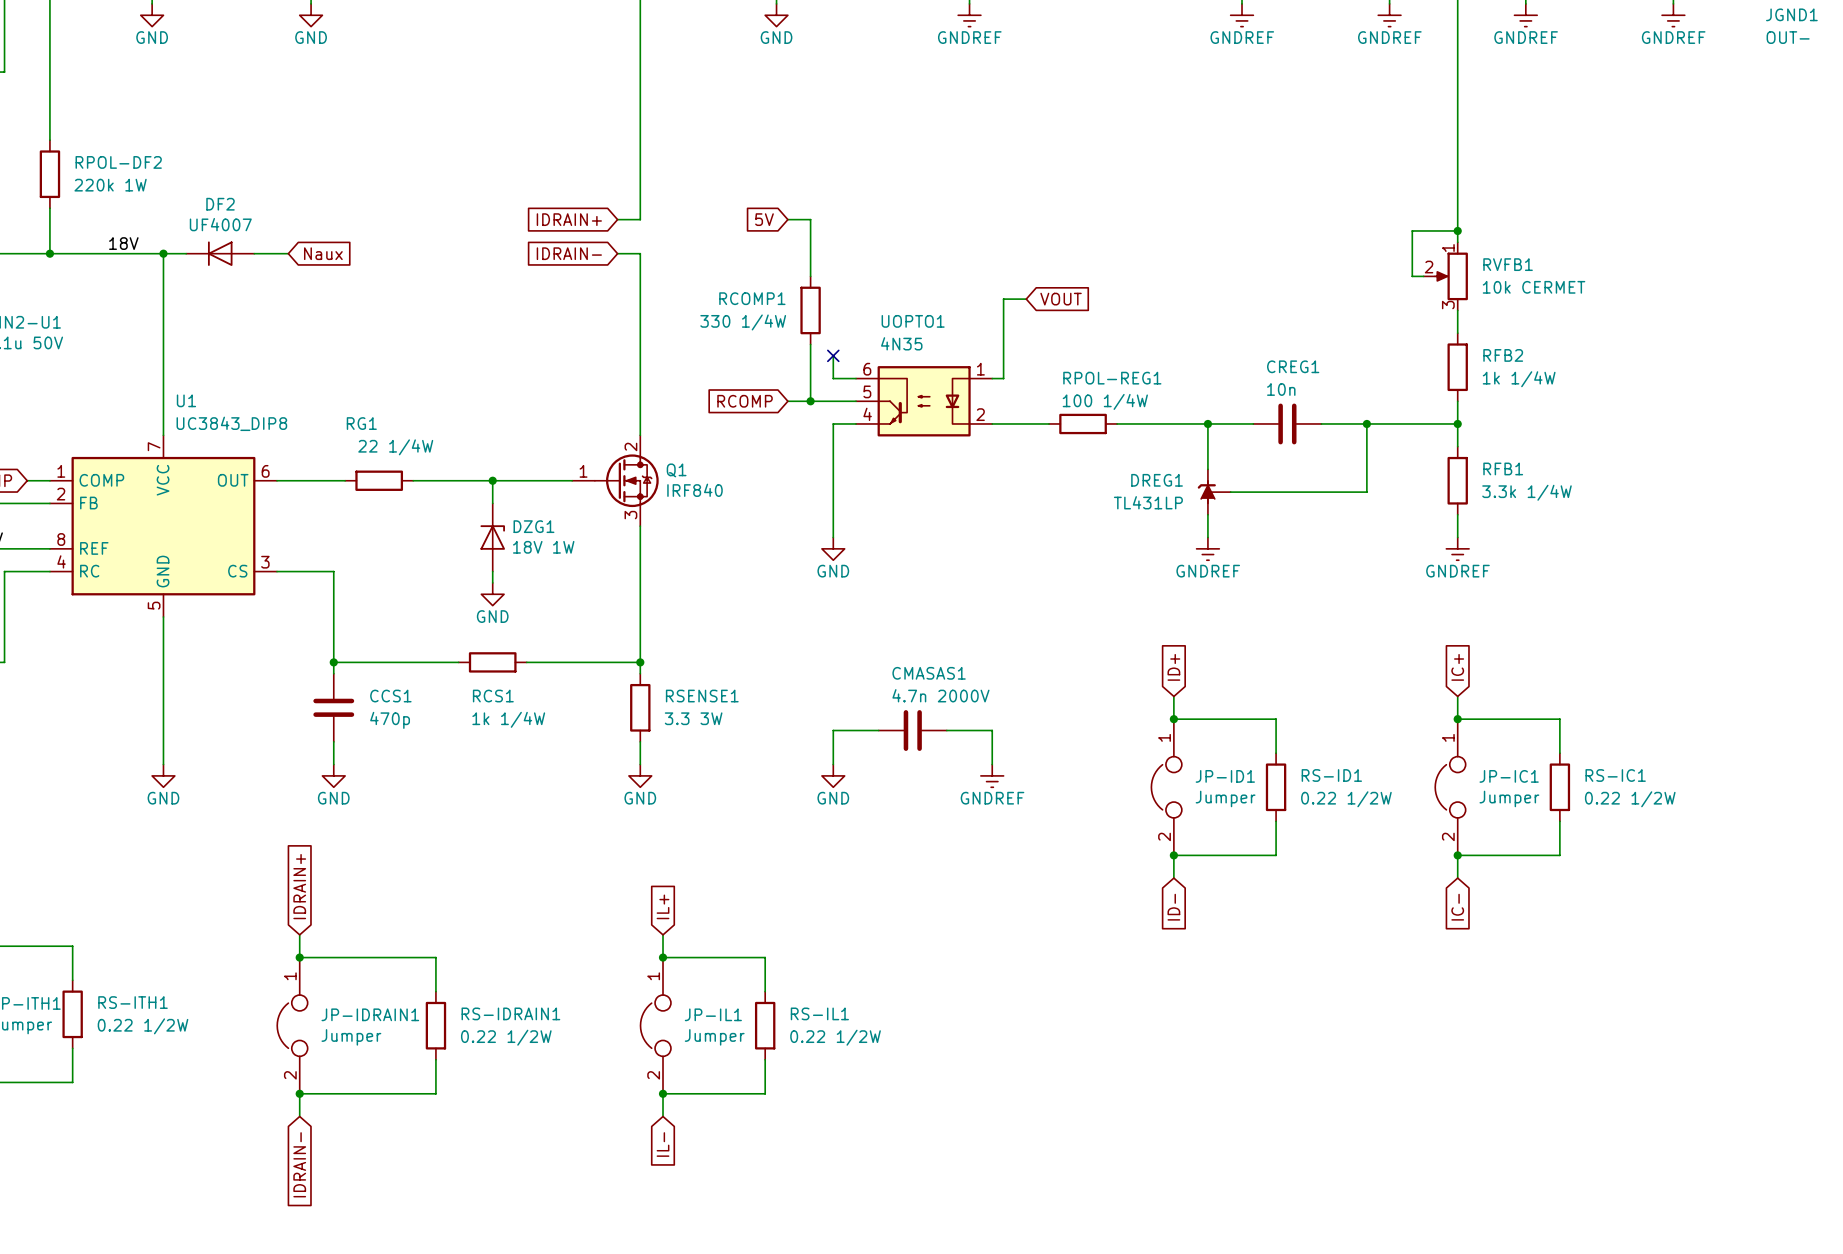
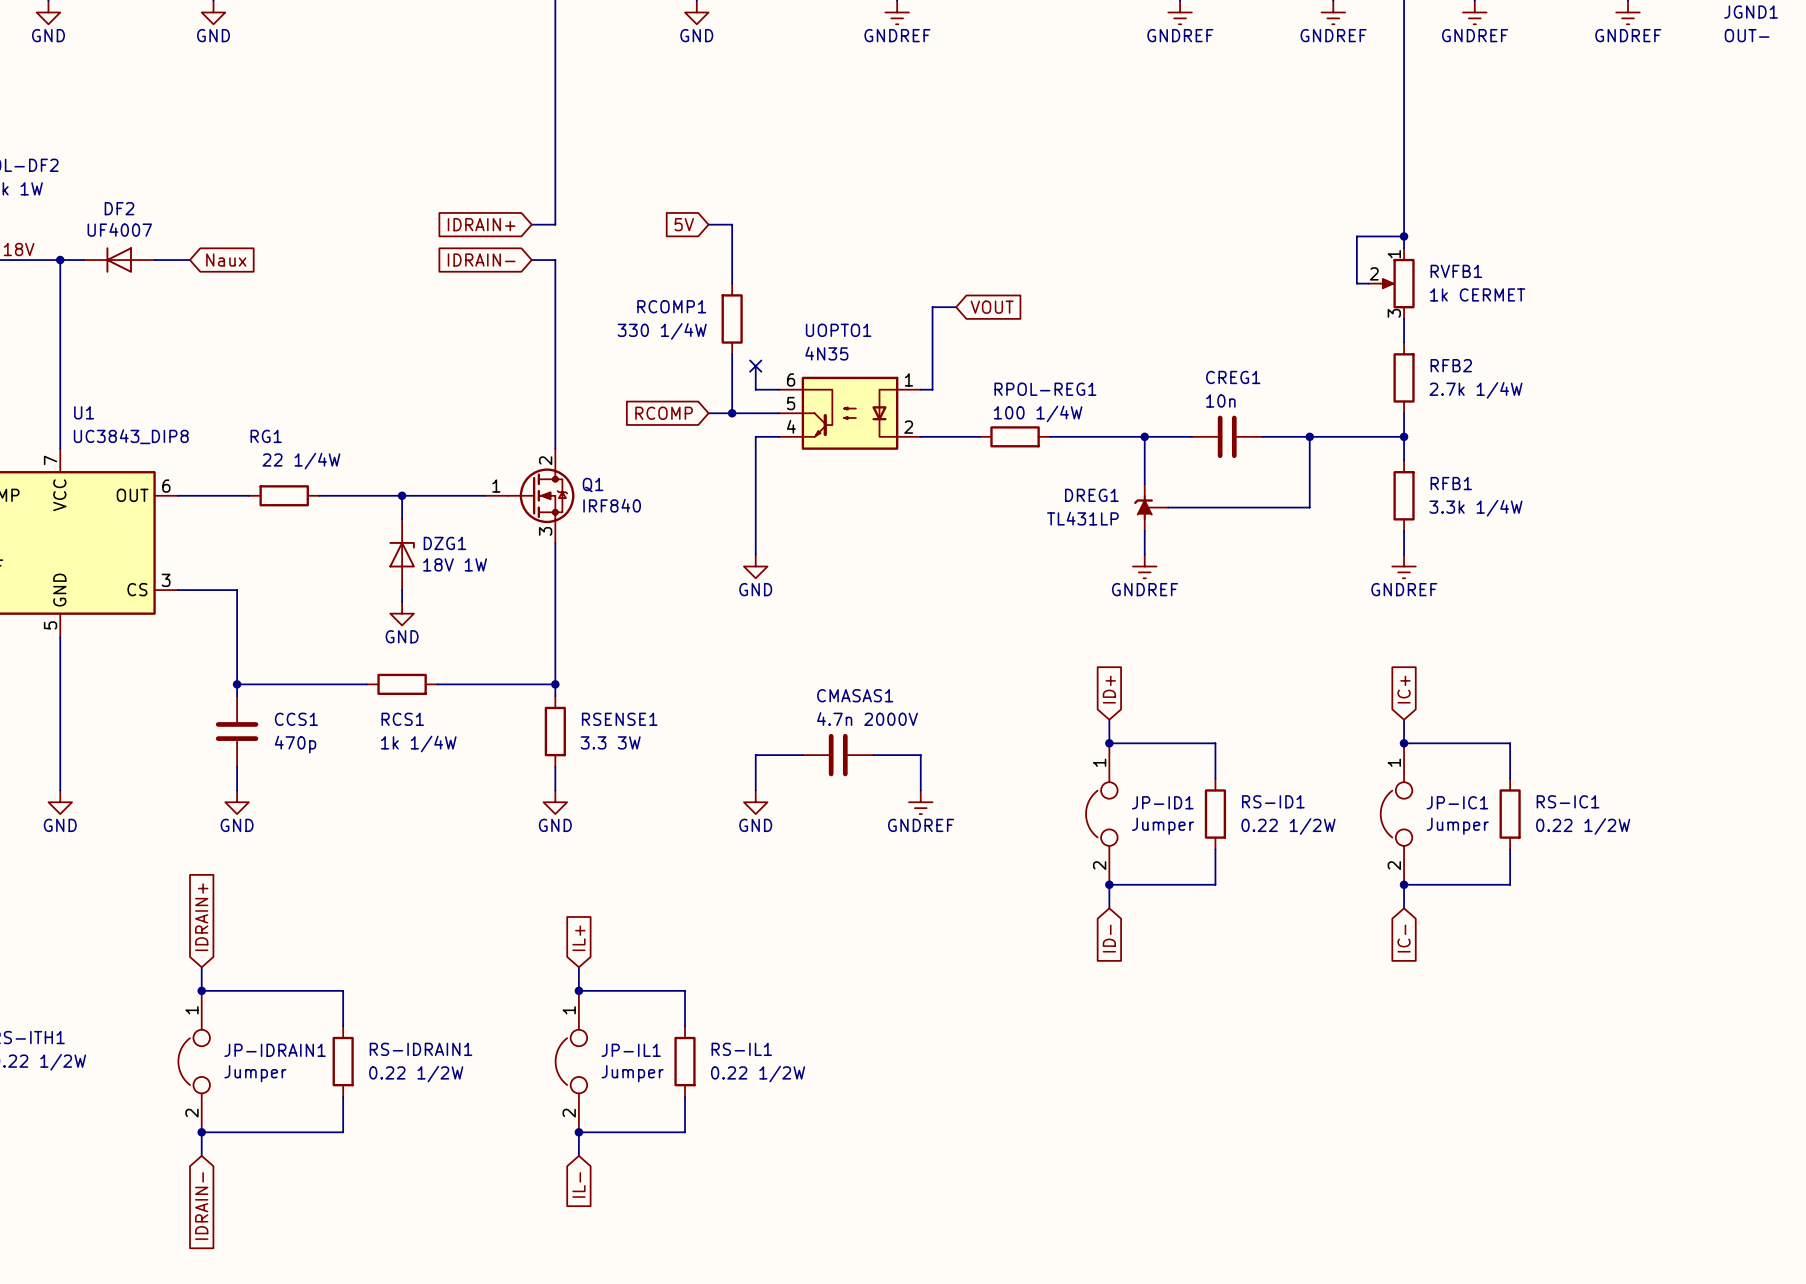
RVFB1 value: 10k CERMET (1534, 287) -> 1k CERMET (1477, 294)
RFB2 value: 1k 1/4W (1519, 379) -> 2.7k 1/4W (1475, 390)

